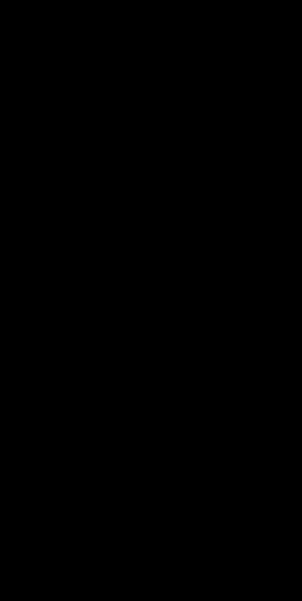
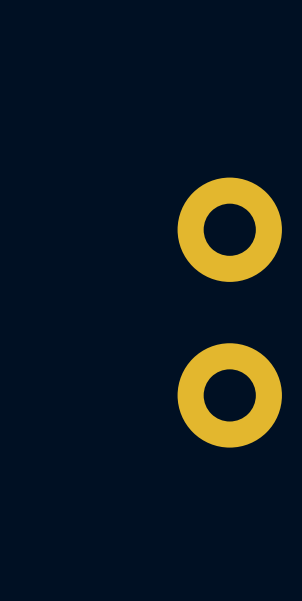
part: none -> (229, 312)

